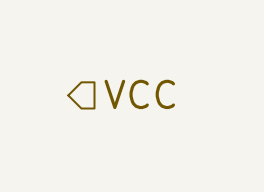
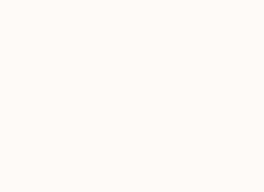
hierarchical label: VCC (139, 94) -> none

